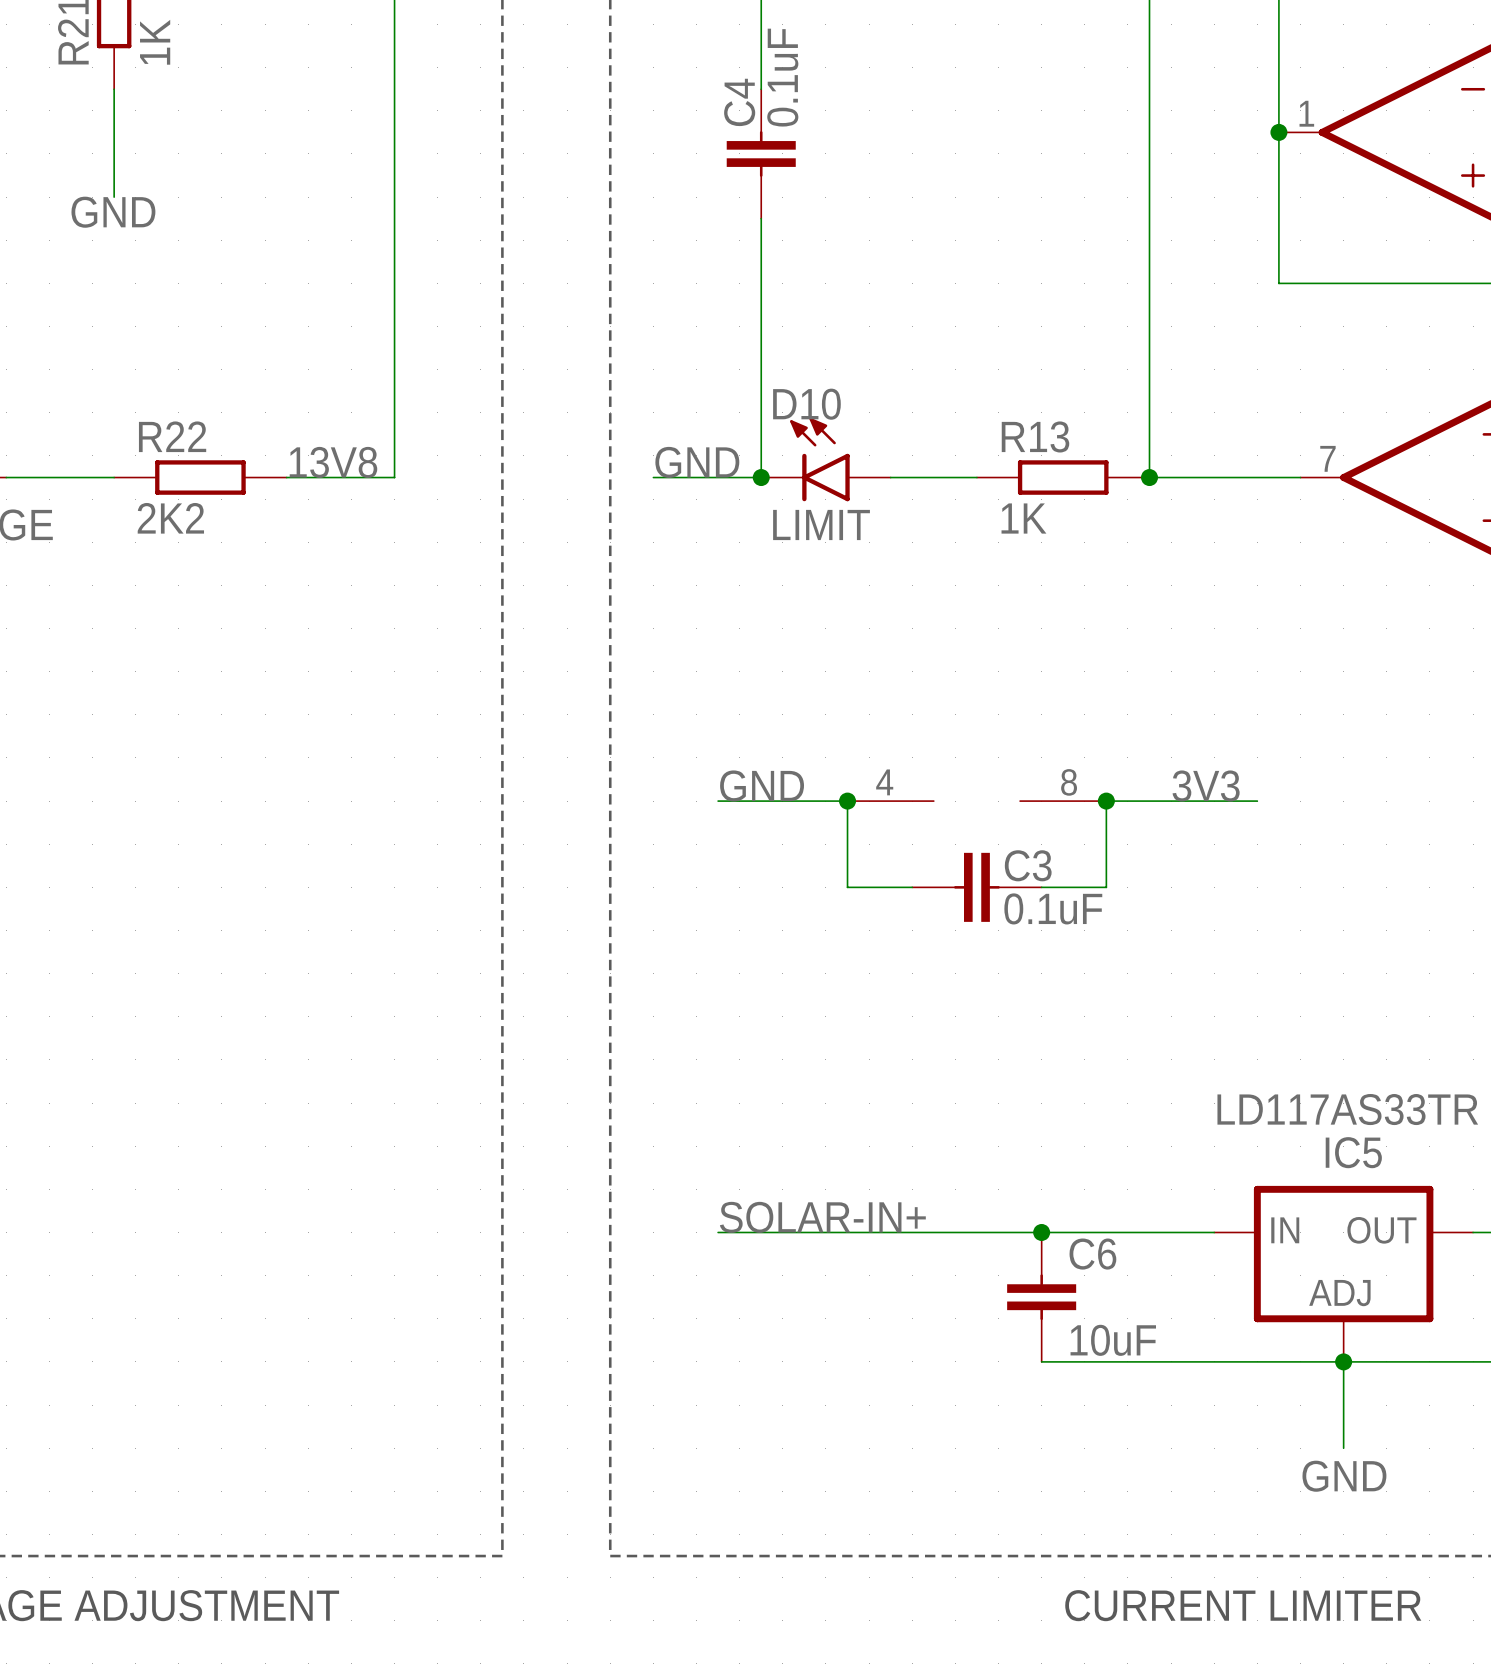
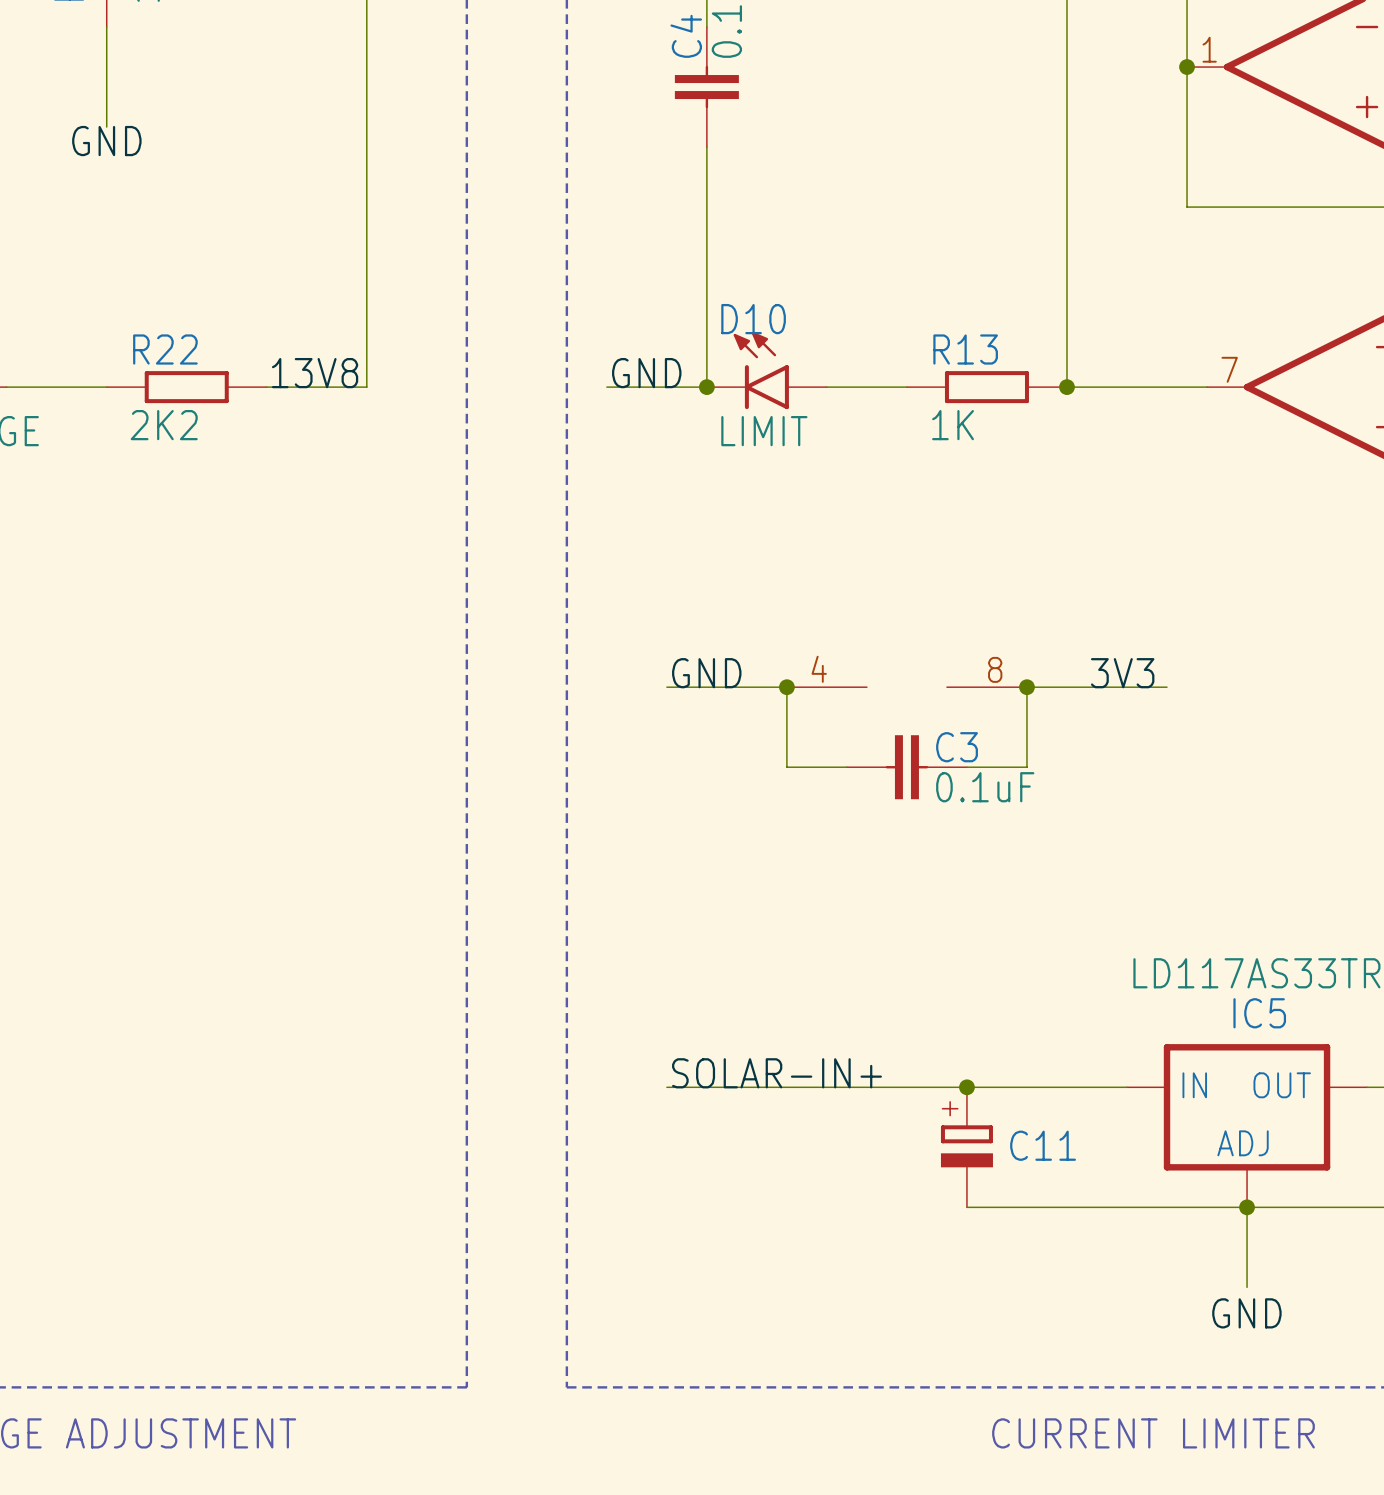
C6: 10uF (1041, 1297) -> none
C11: none -> (966, 1147)

